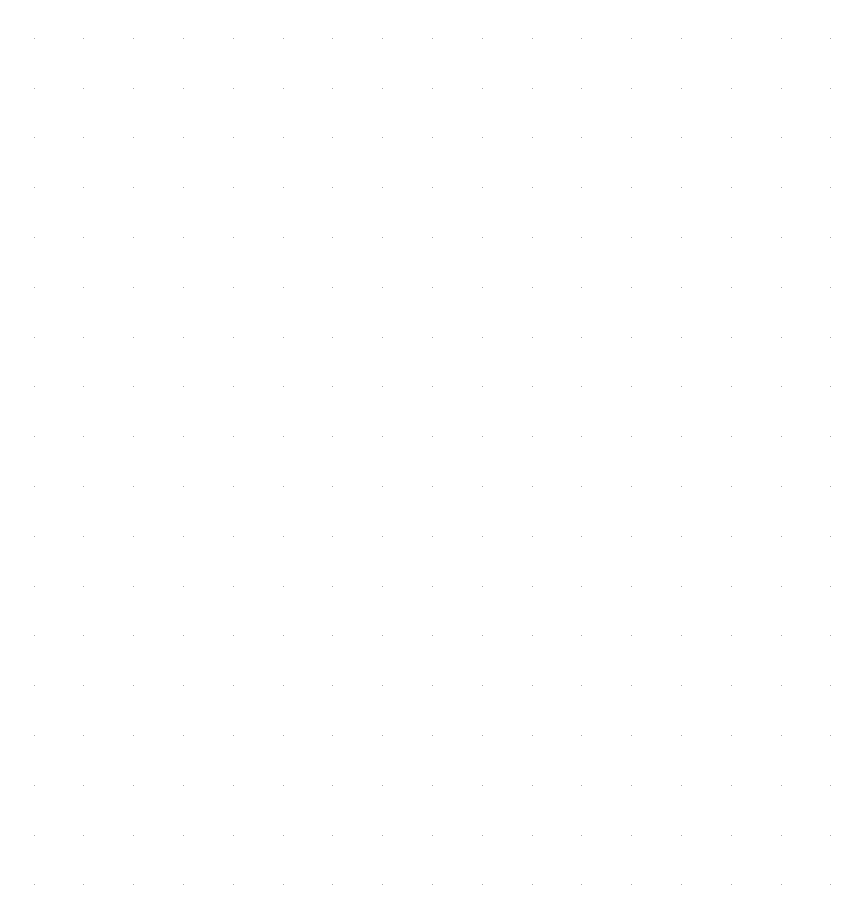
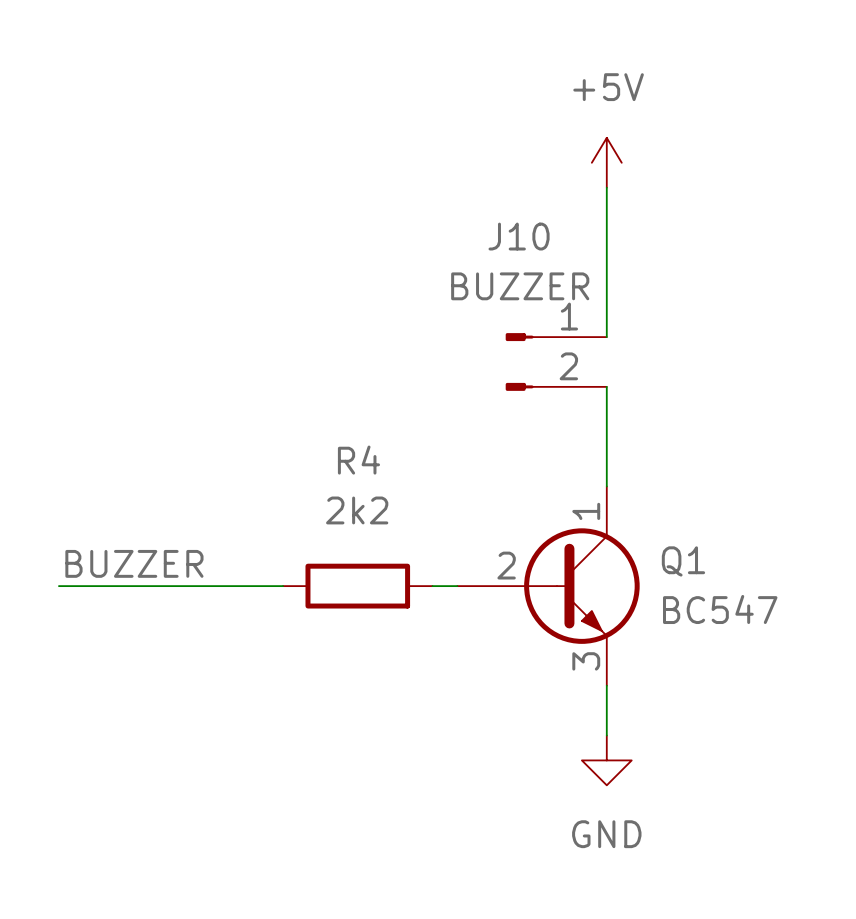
power symbol: none -> +5V (606, 162)
wire: none -> (606, 187) (606, 337)
J10: none -> BUZZER (556, 361)
wire: none -> (606, 386) (606, 486)
label: none -> BUZZER (134, 563)
wire: none -> (58, 586) (283, 586)
R4: none -> 2k2 (357, 586)
wire: none -> (432, 586) (457, 586)
Q1: none -> BC547 (548, 586)
wire: none -> (606, 685) (606, 735)
power symbol: none -> GND (606, 760)

